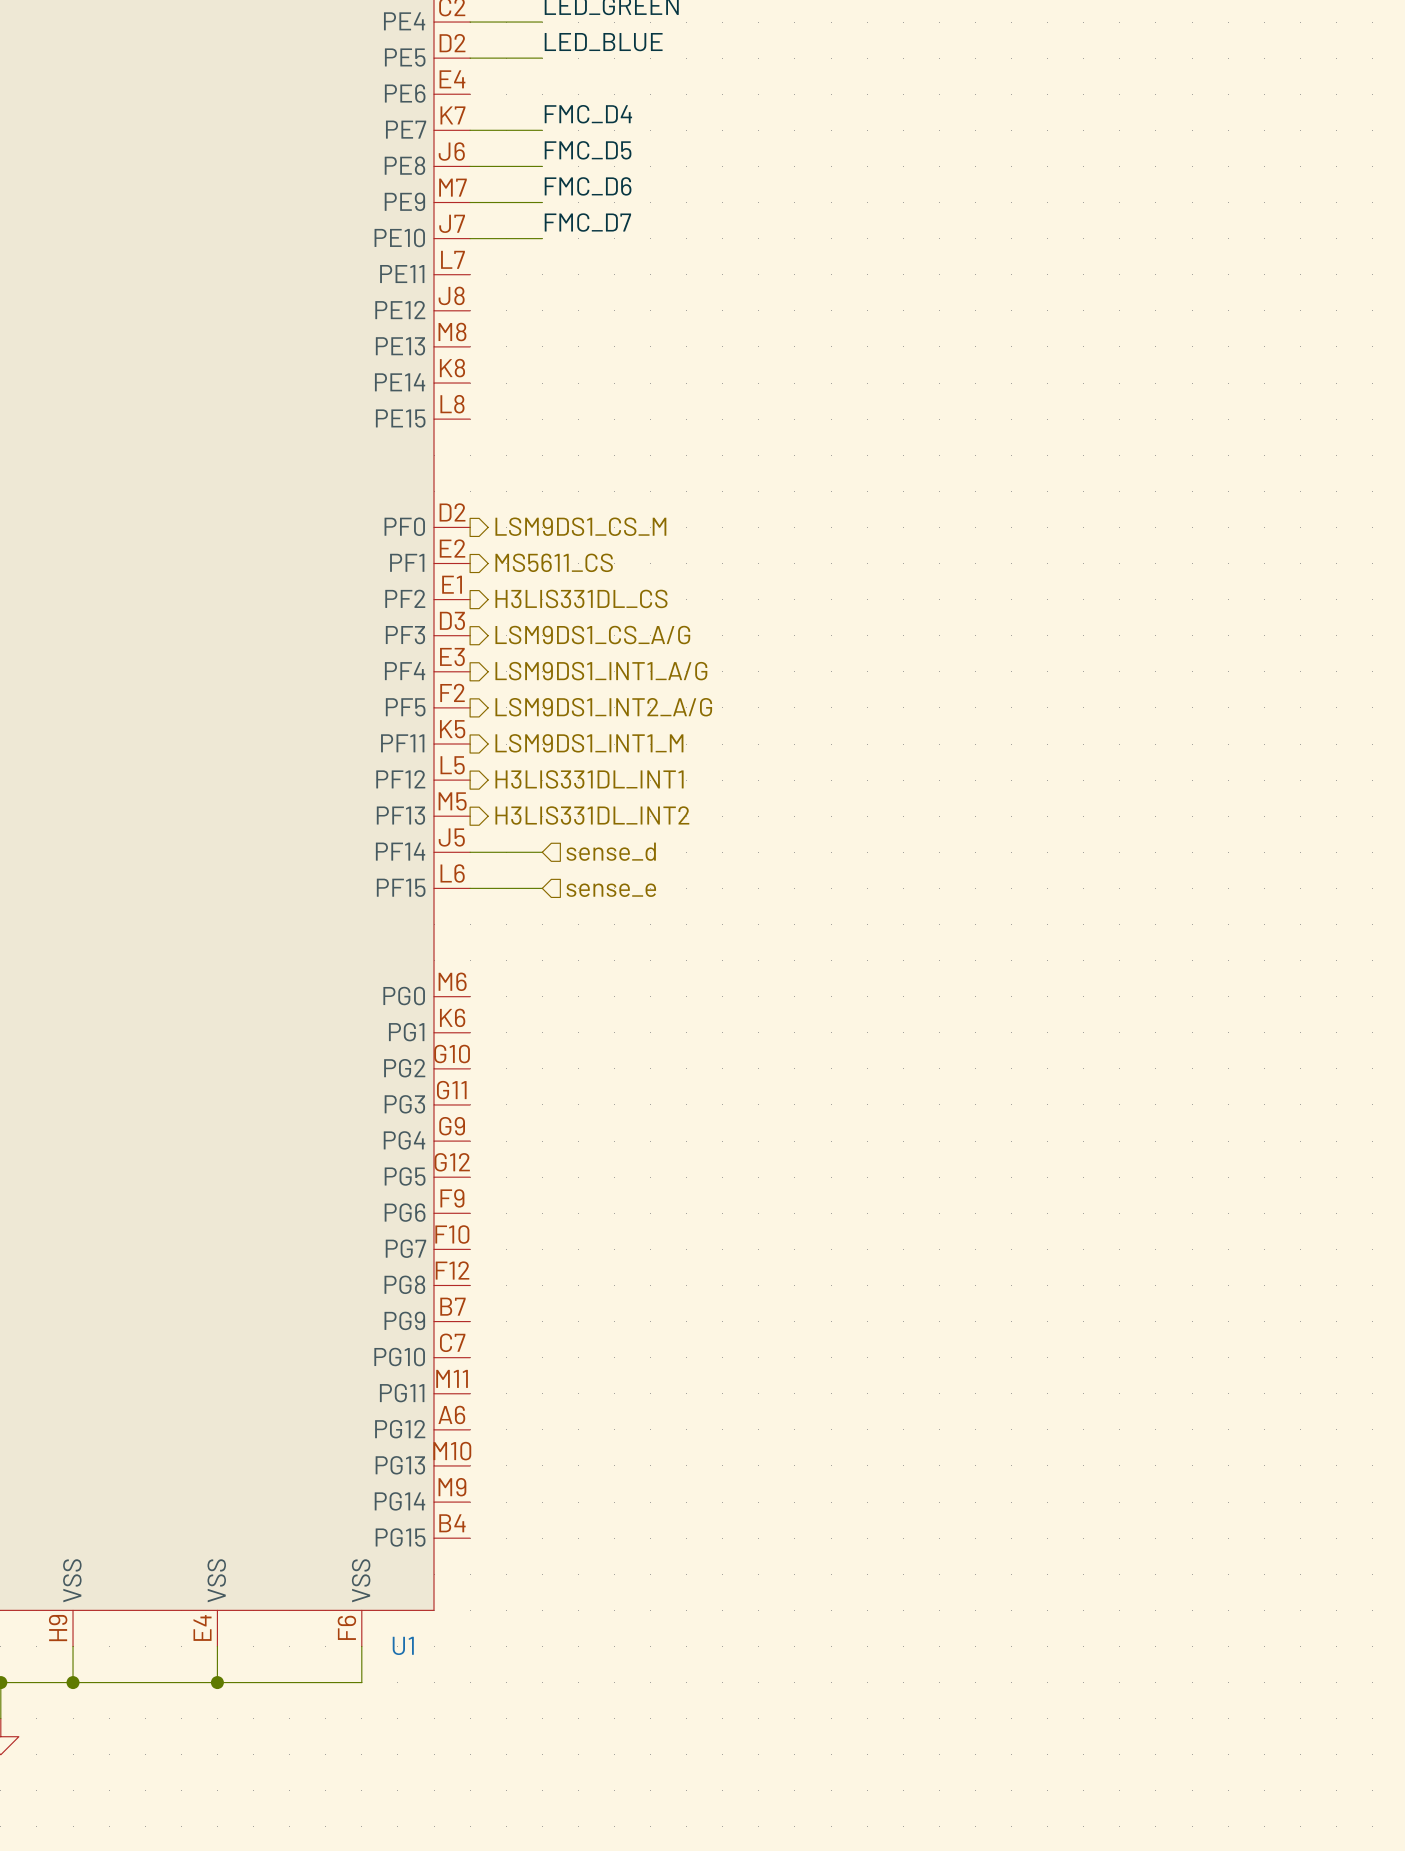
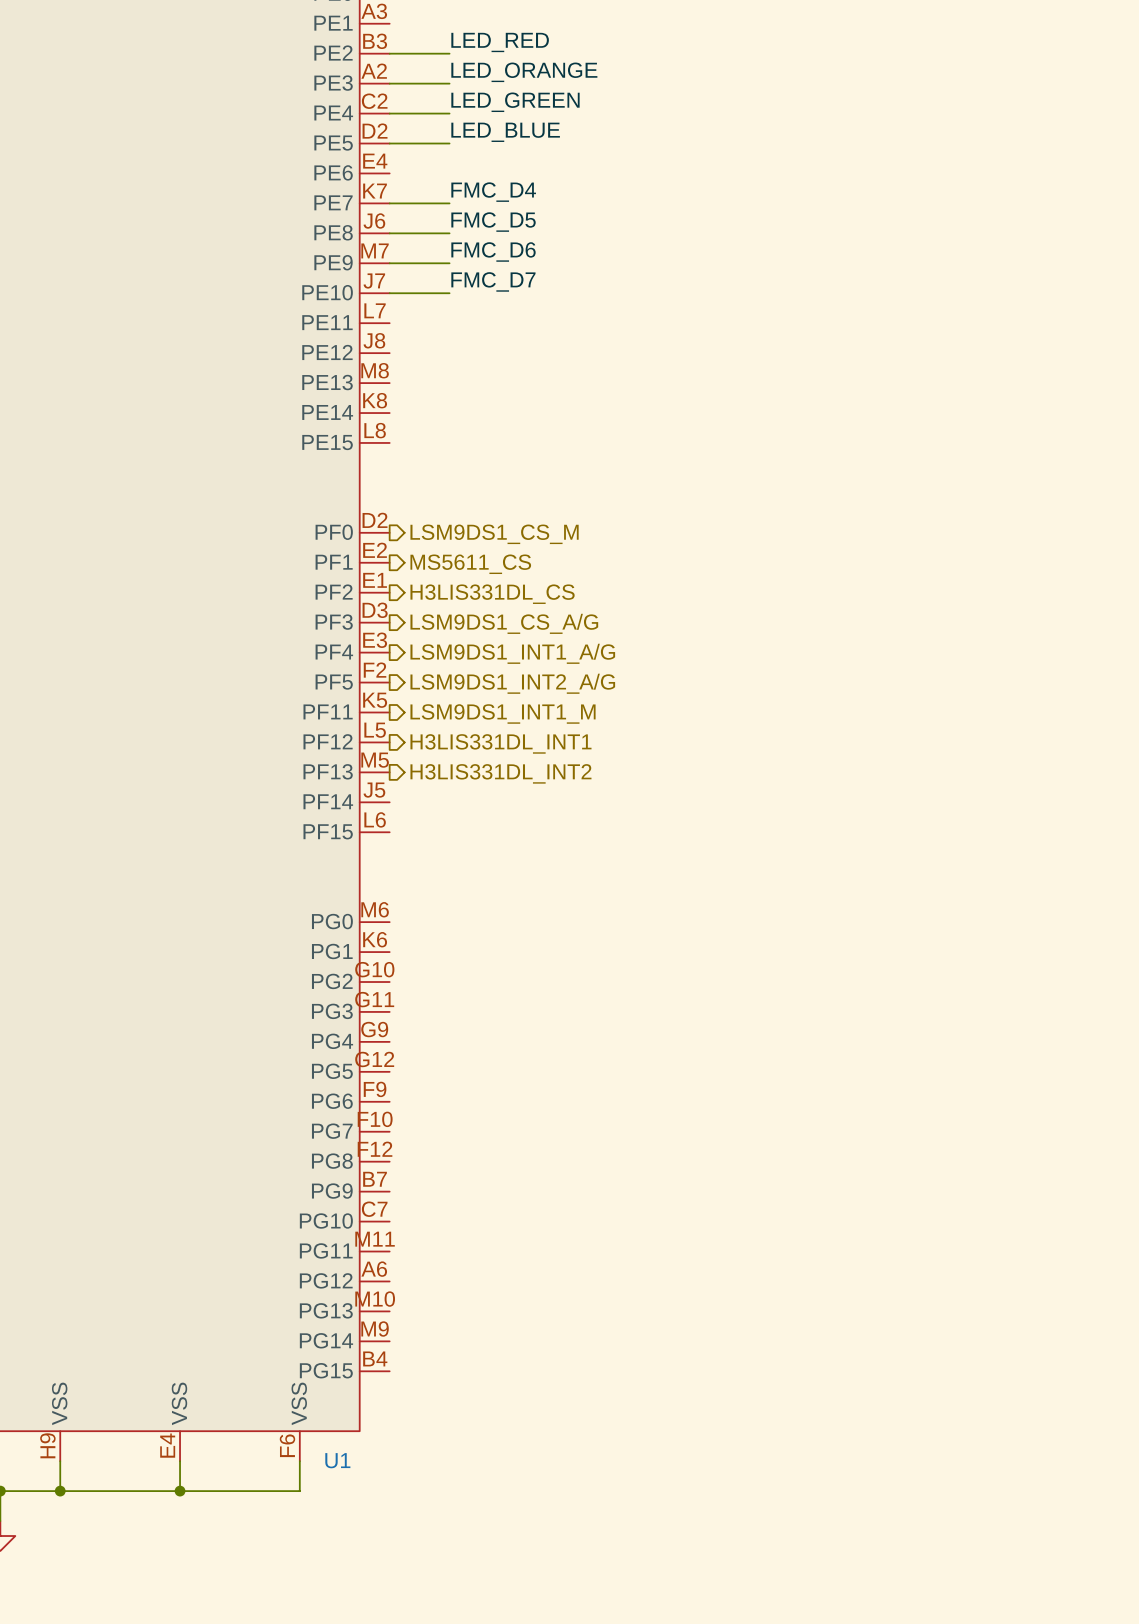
hierarchical label: sense_d (611, 851) -> none
wire: (470, 852) (542, 852) -> none
wire: (470, 888) (542, 888) -> none
hierarchical label: sense_e (611, 890) -> none

